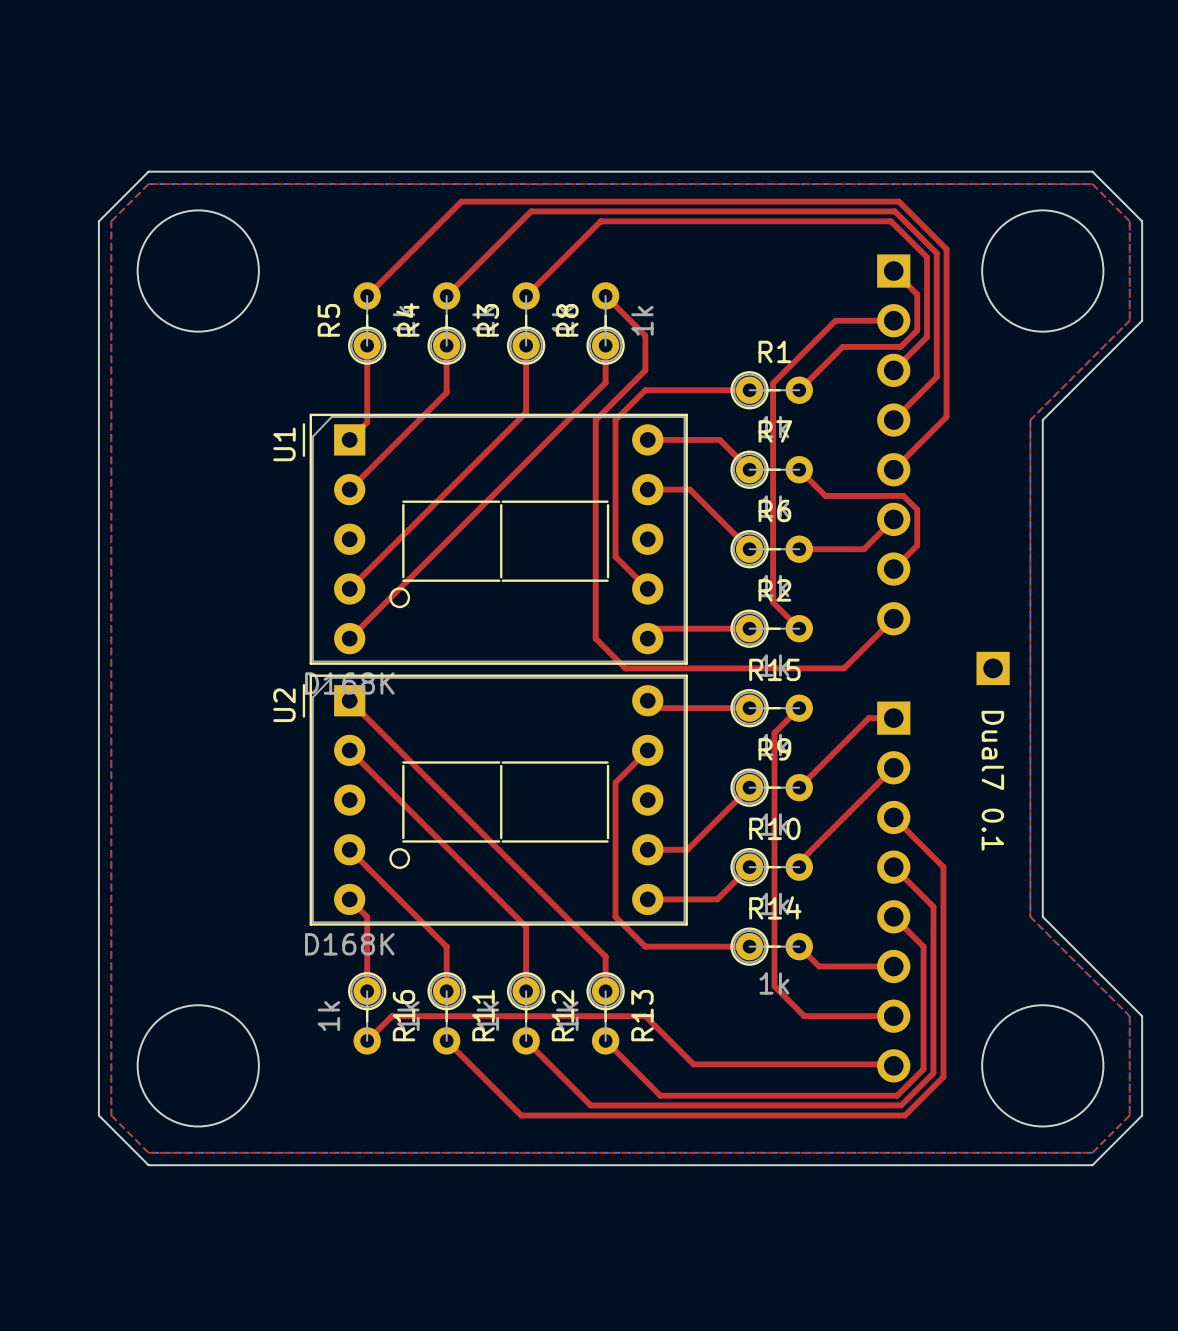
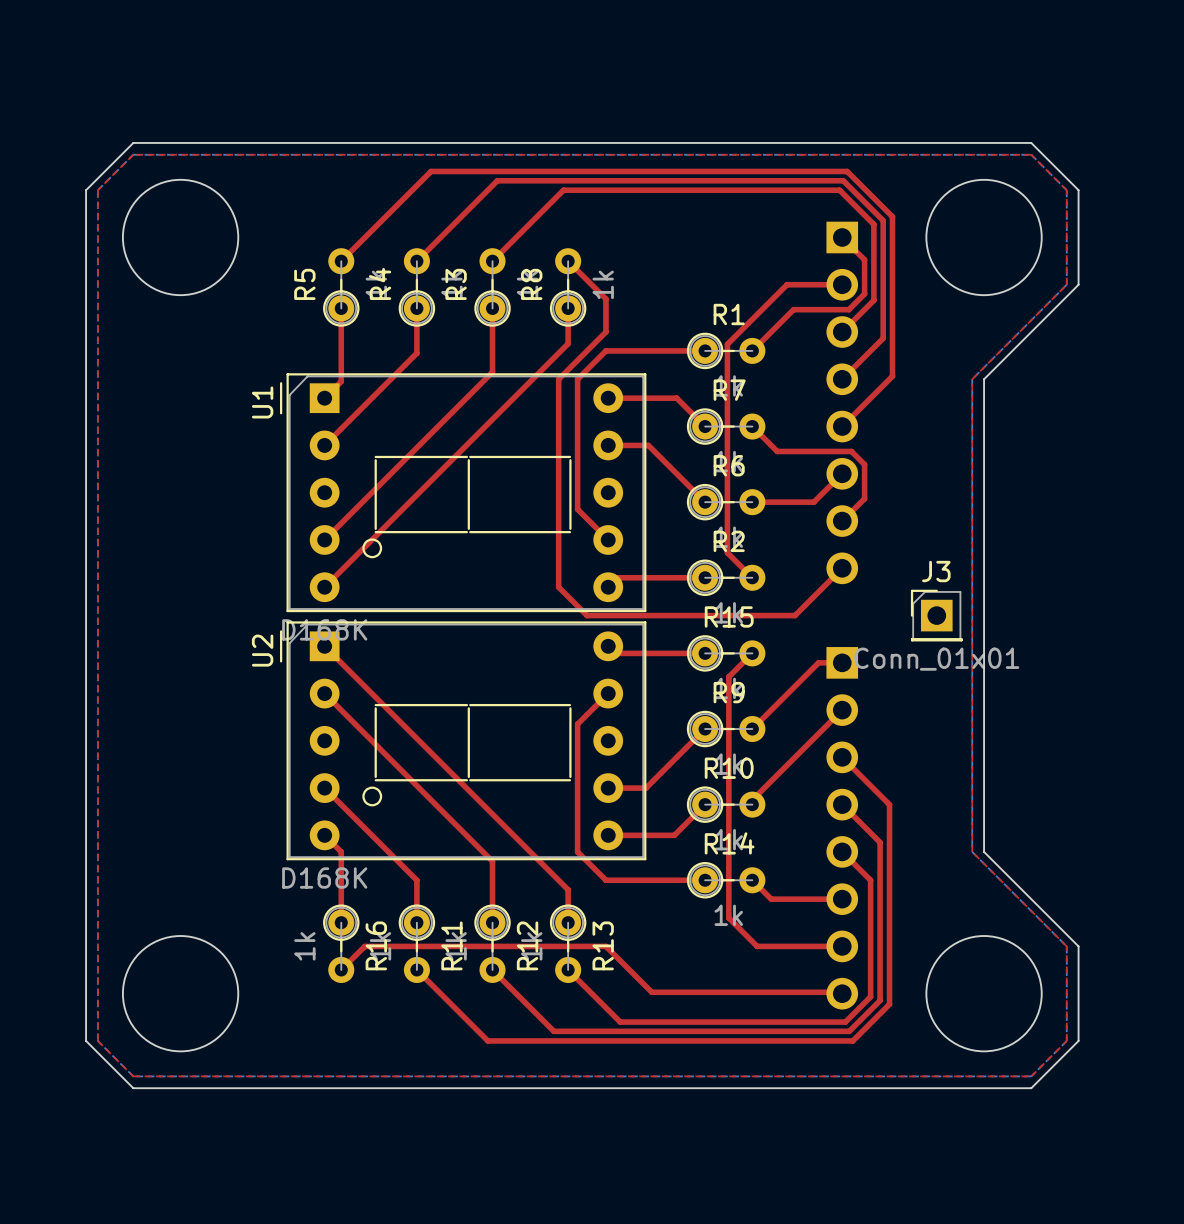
J3 side: bottom (993, 668) -> top (936, 615)
text: Dual7 0.1 (992, 780) -> none

